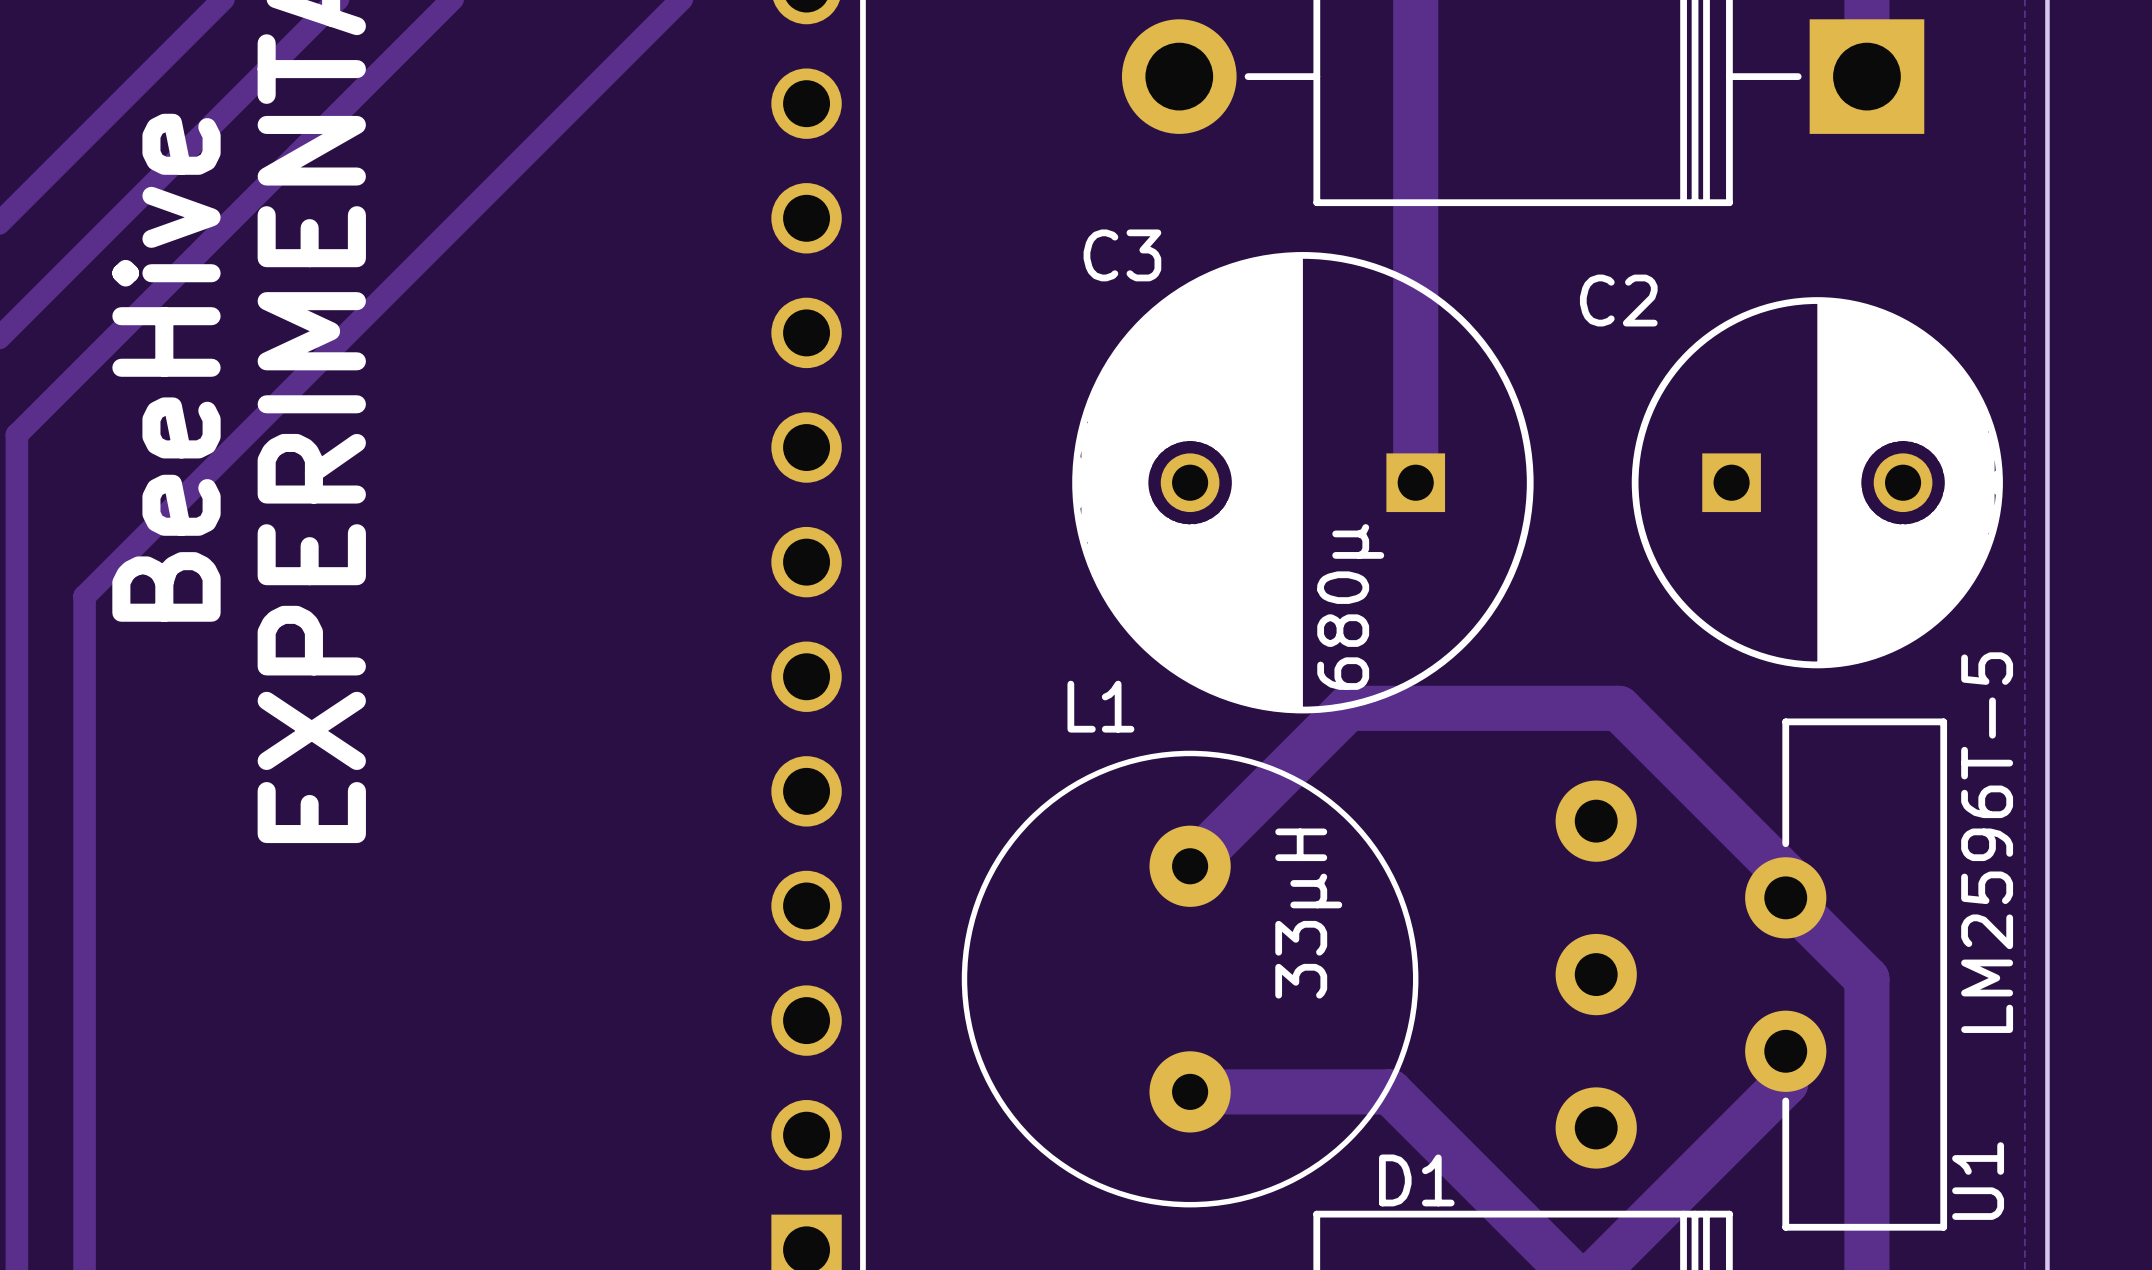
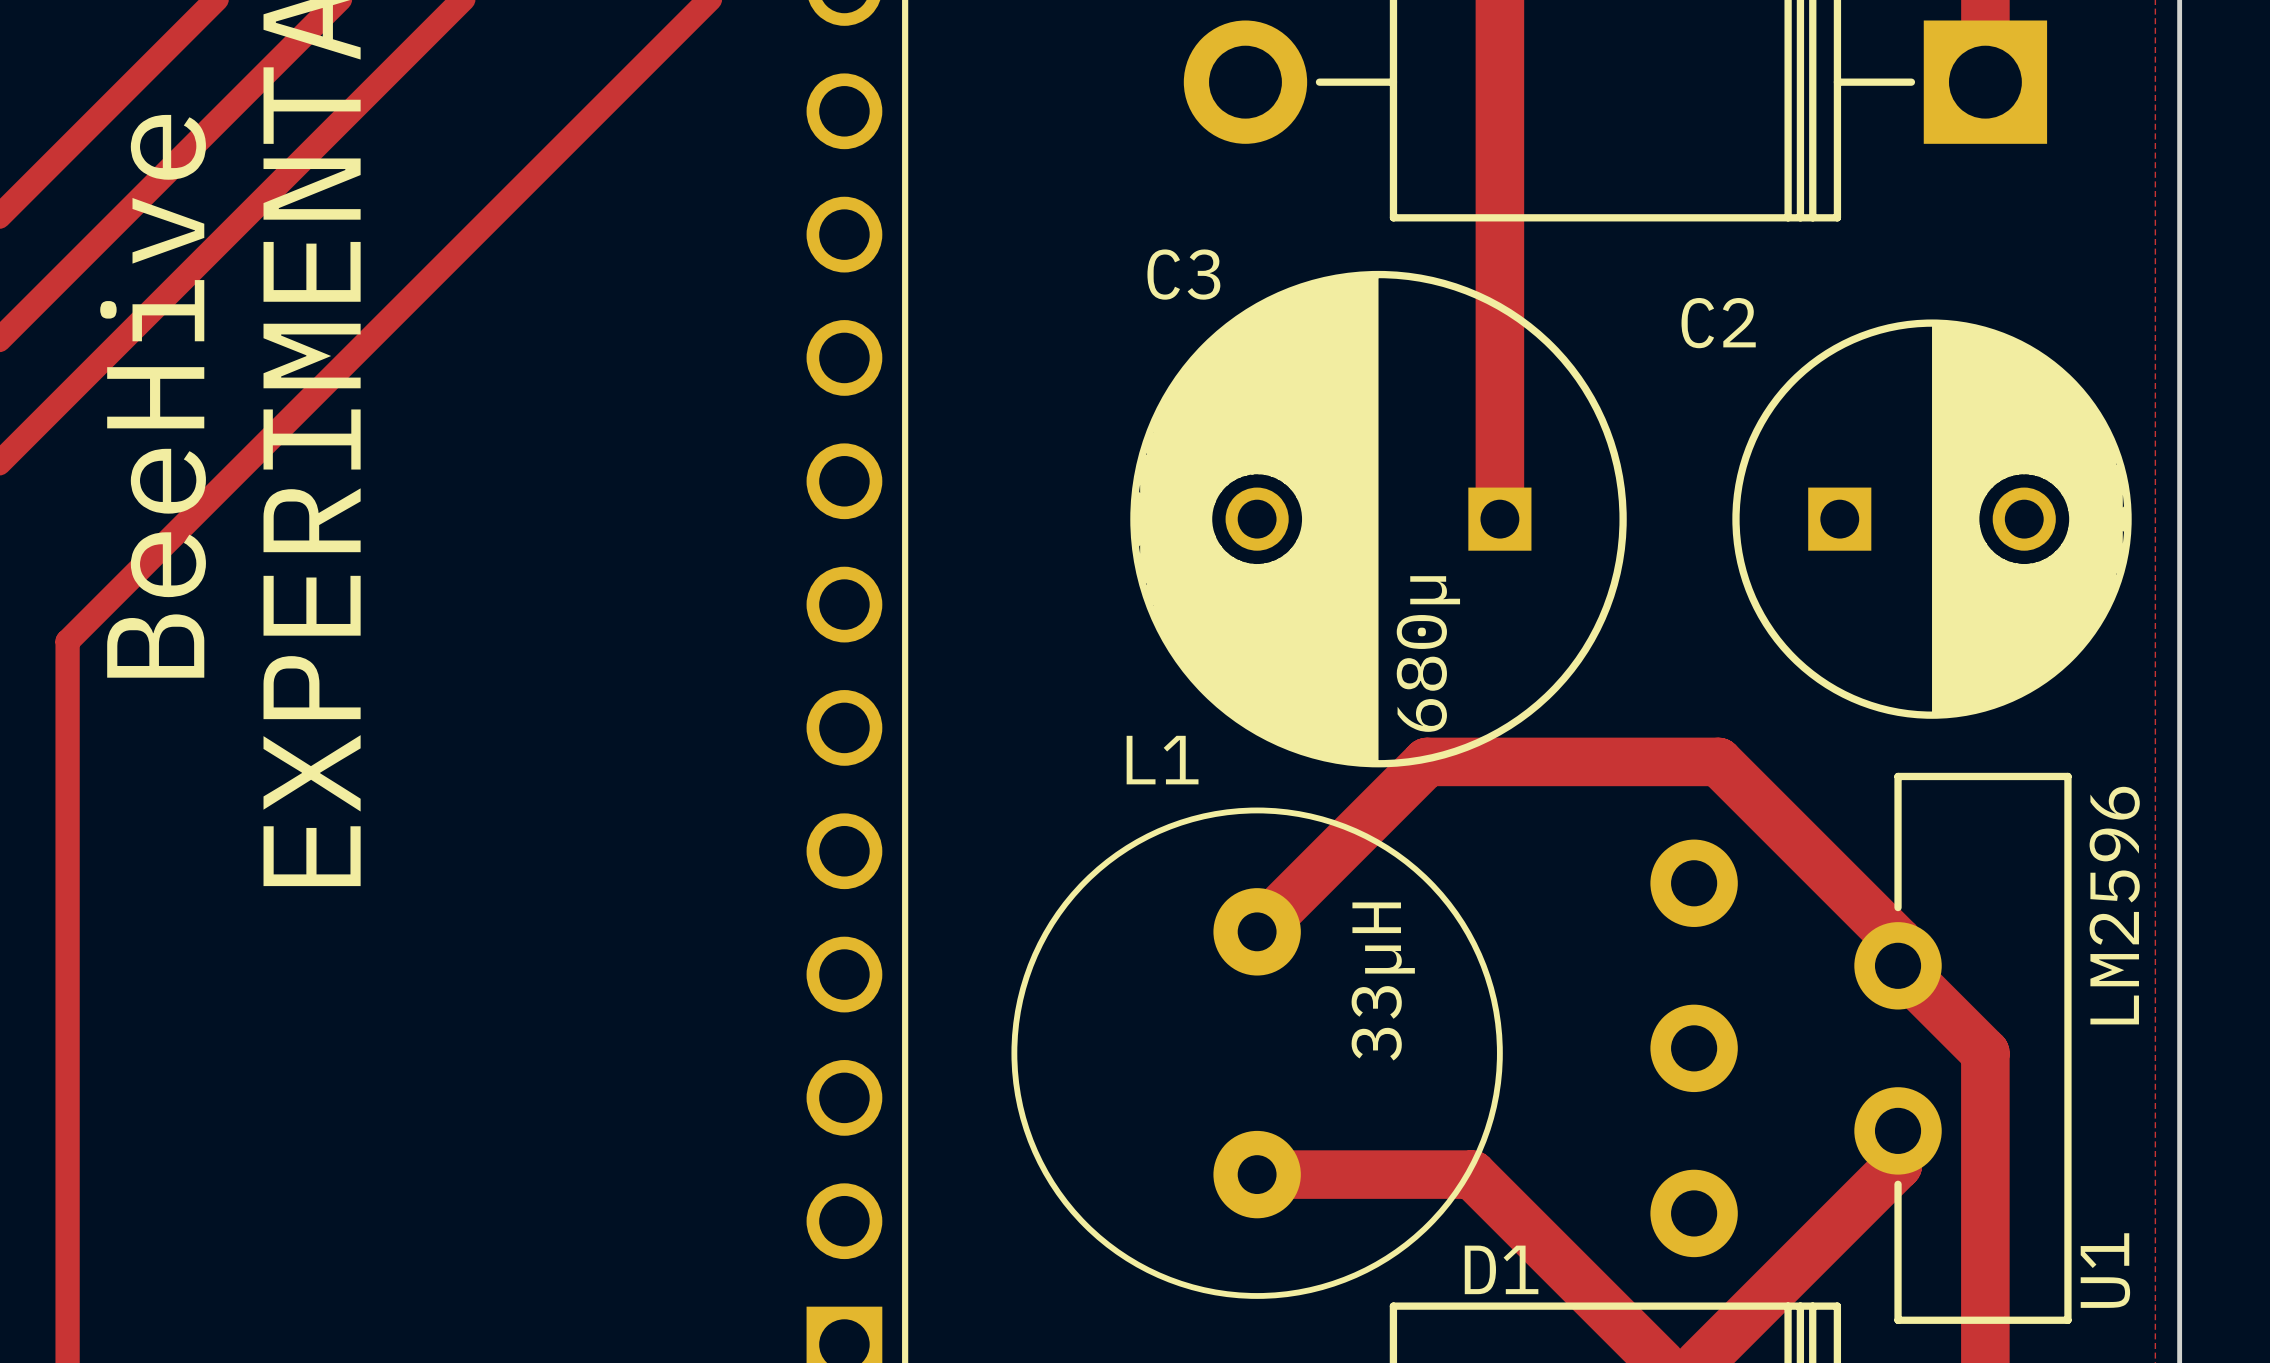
U1 value: LM2596T-5 (1987, 842) -> LM2596 (2114, 905)

